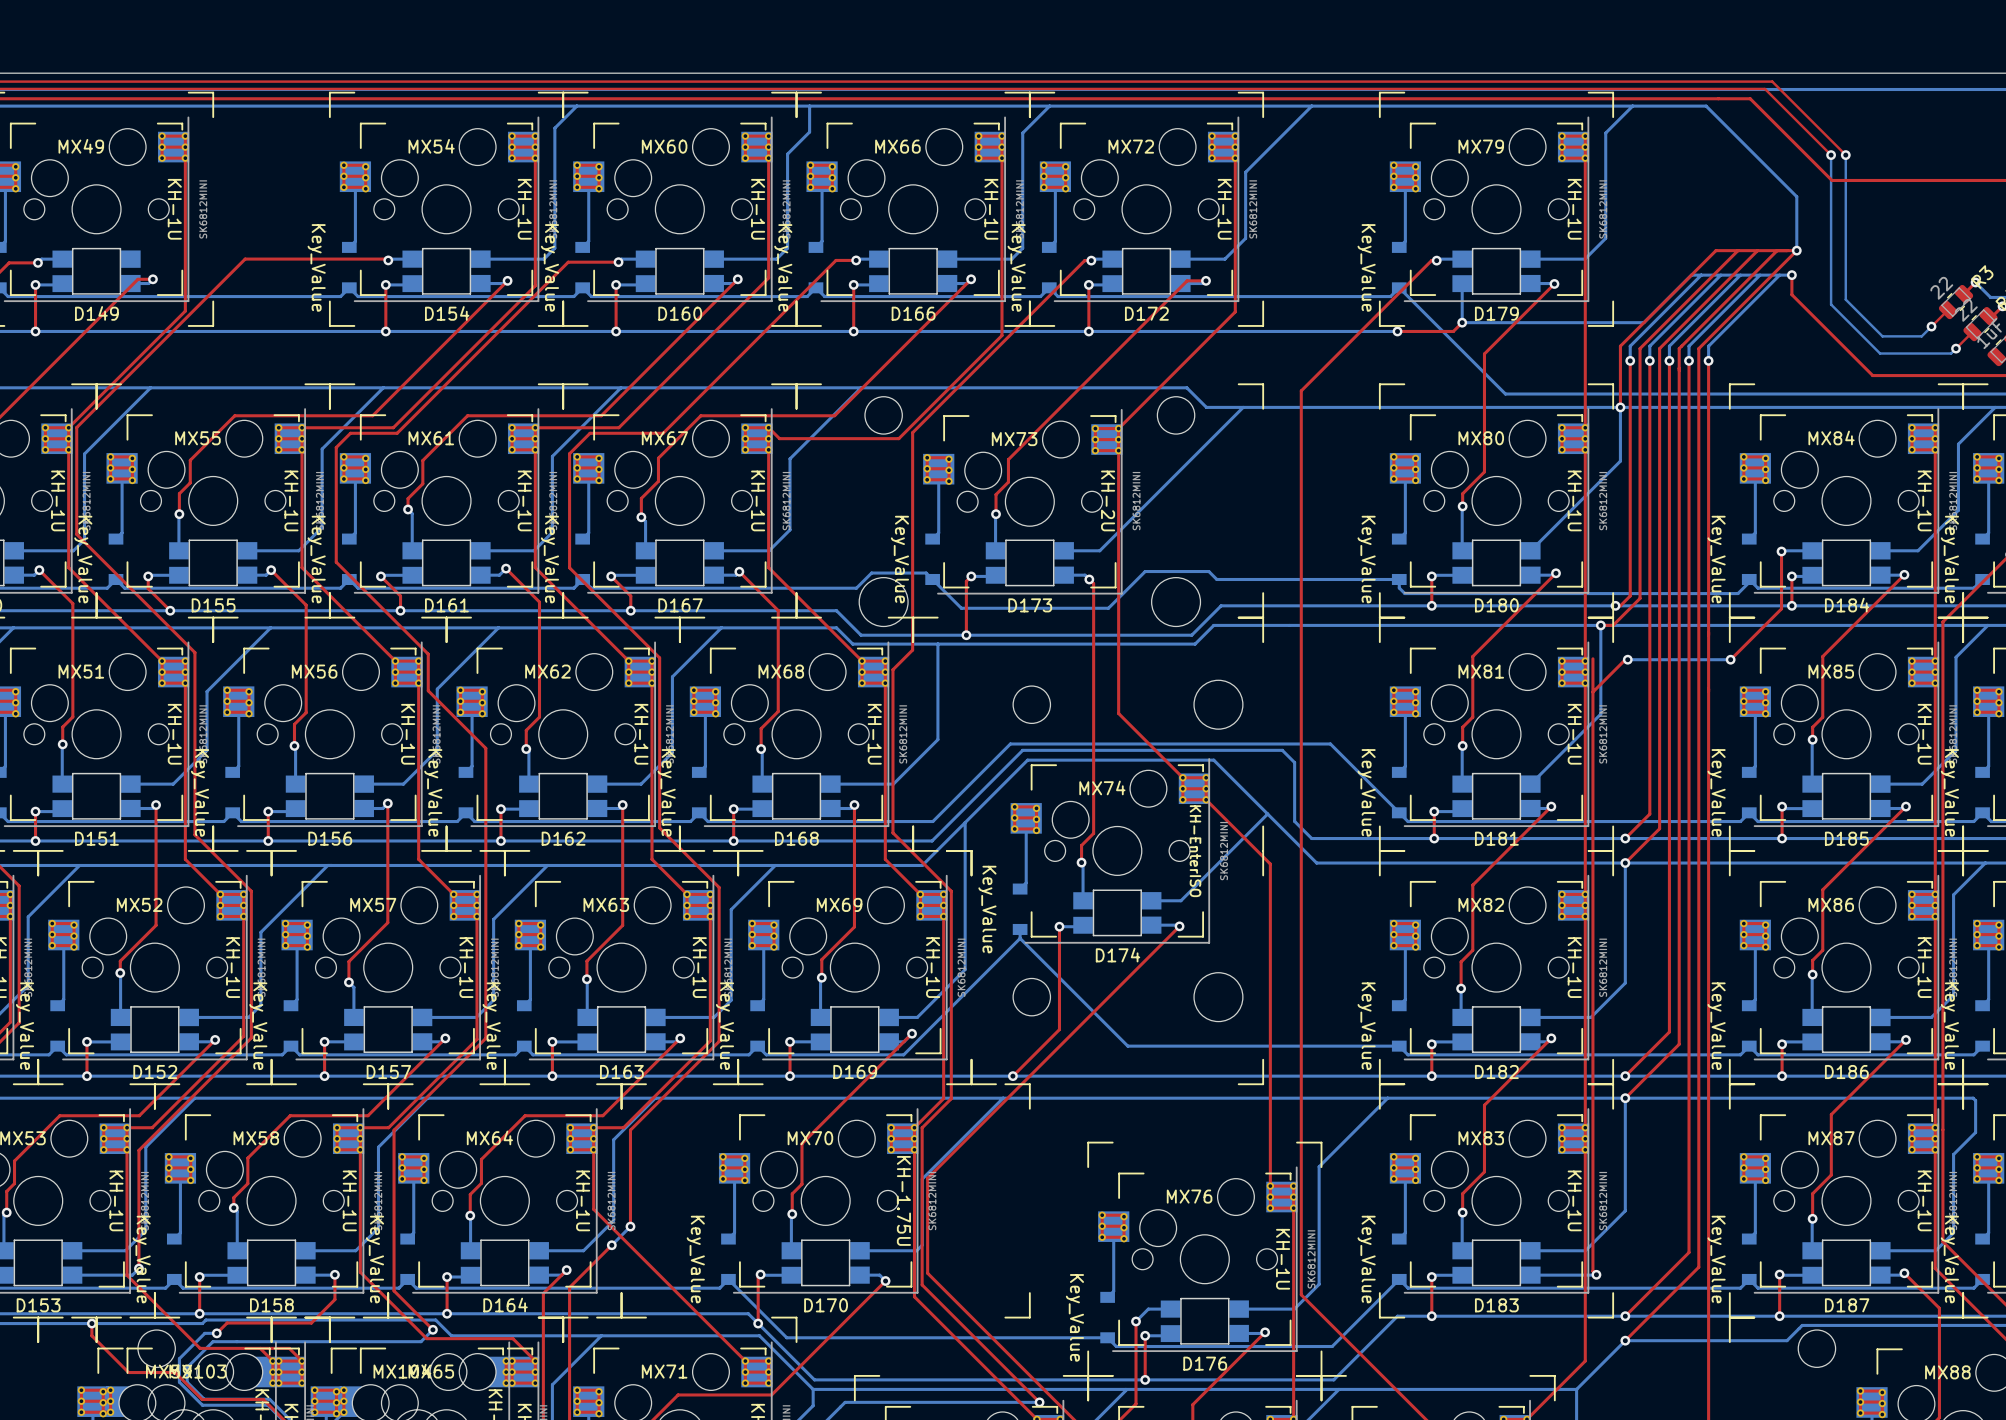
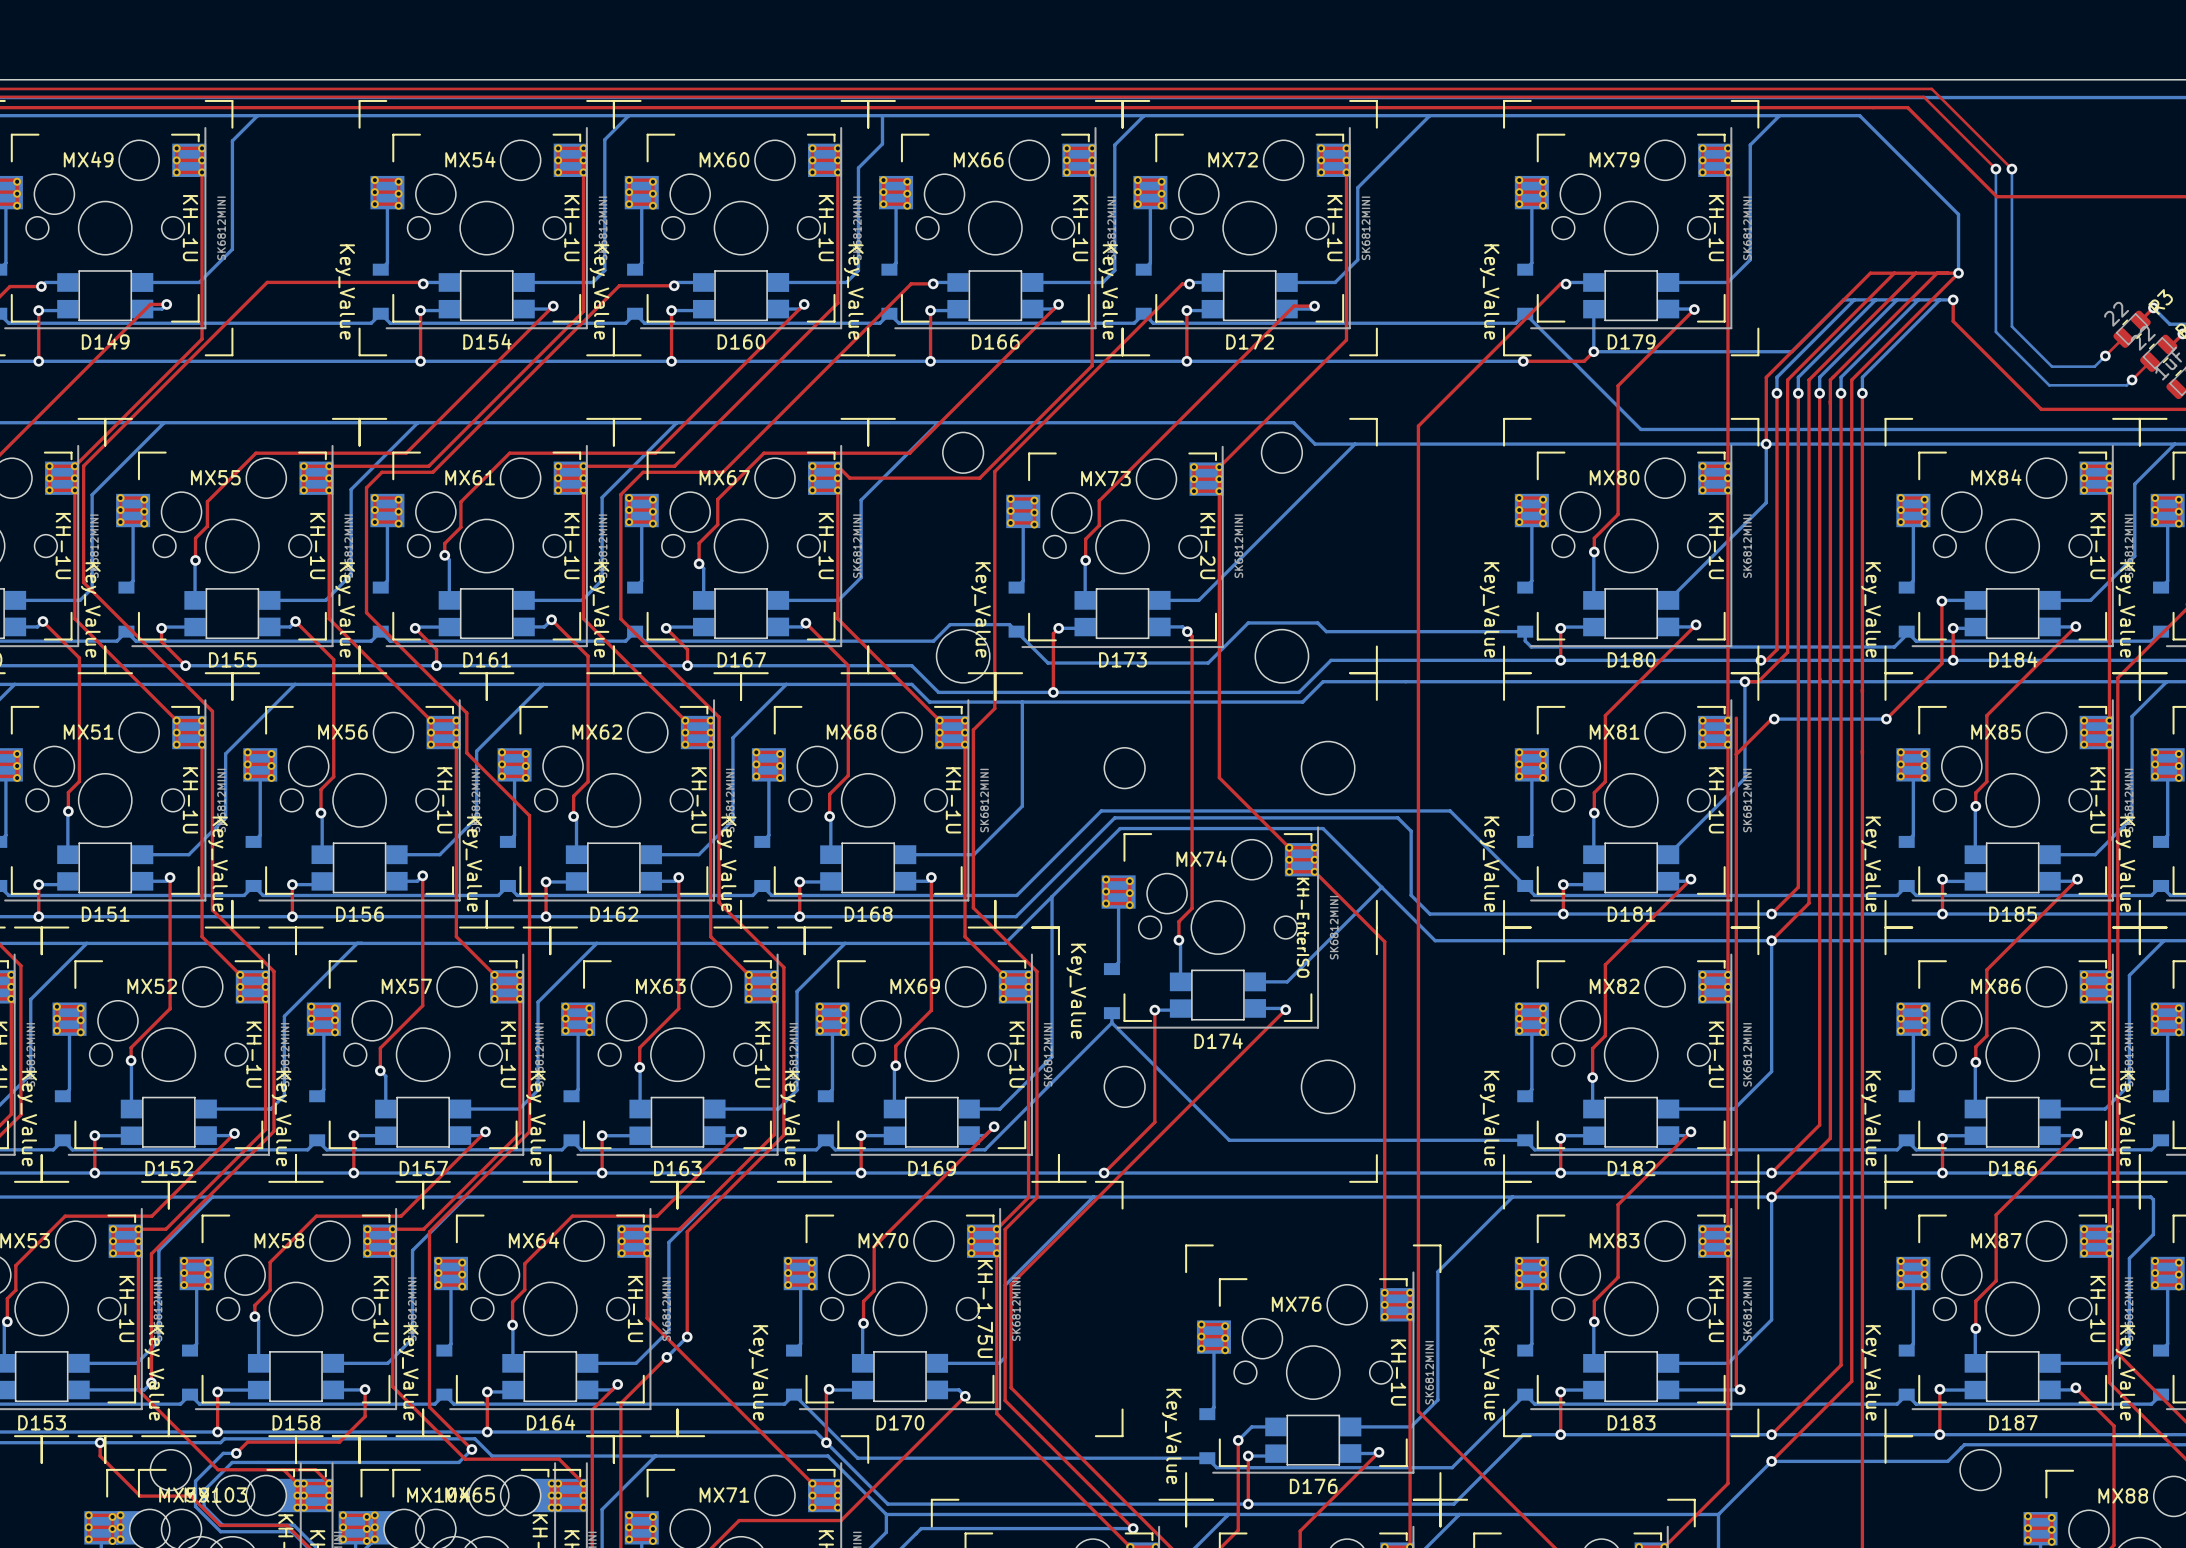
bottom track: none -> (257, 115) (232, 140) (232, 249) (199, 282) (142, 282)

